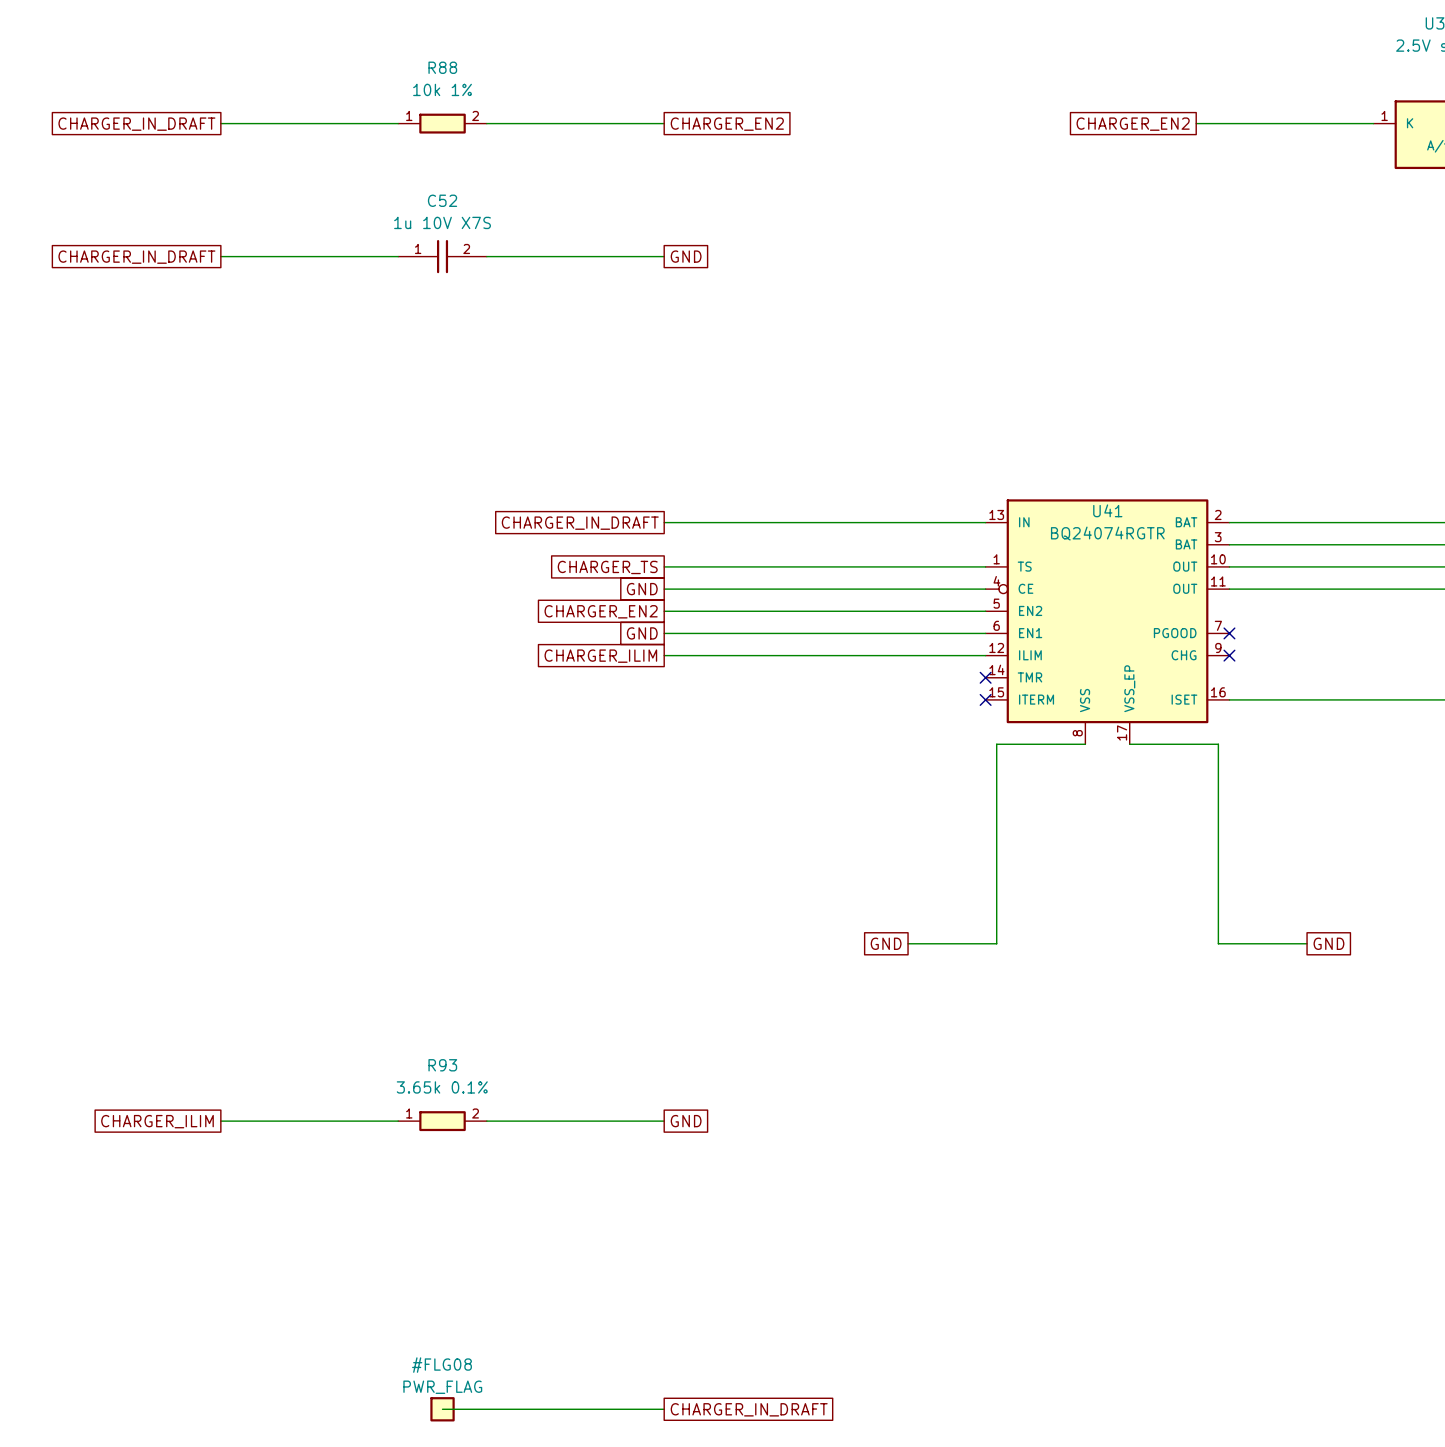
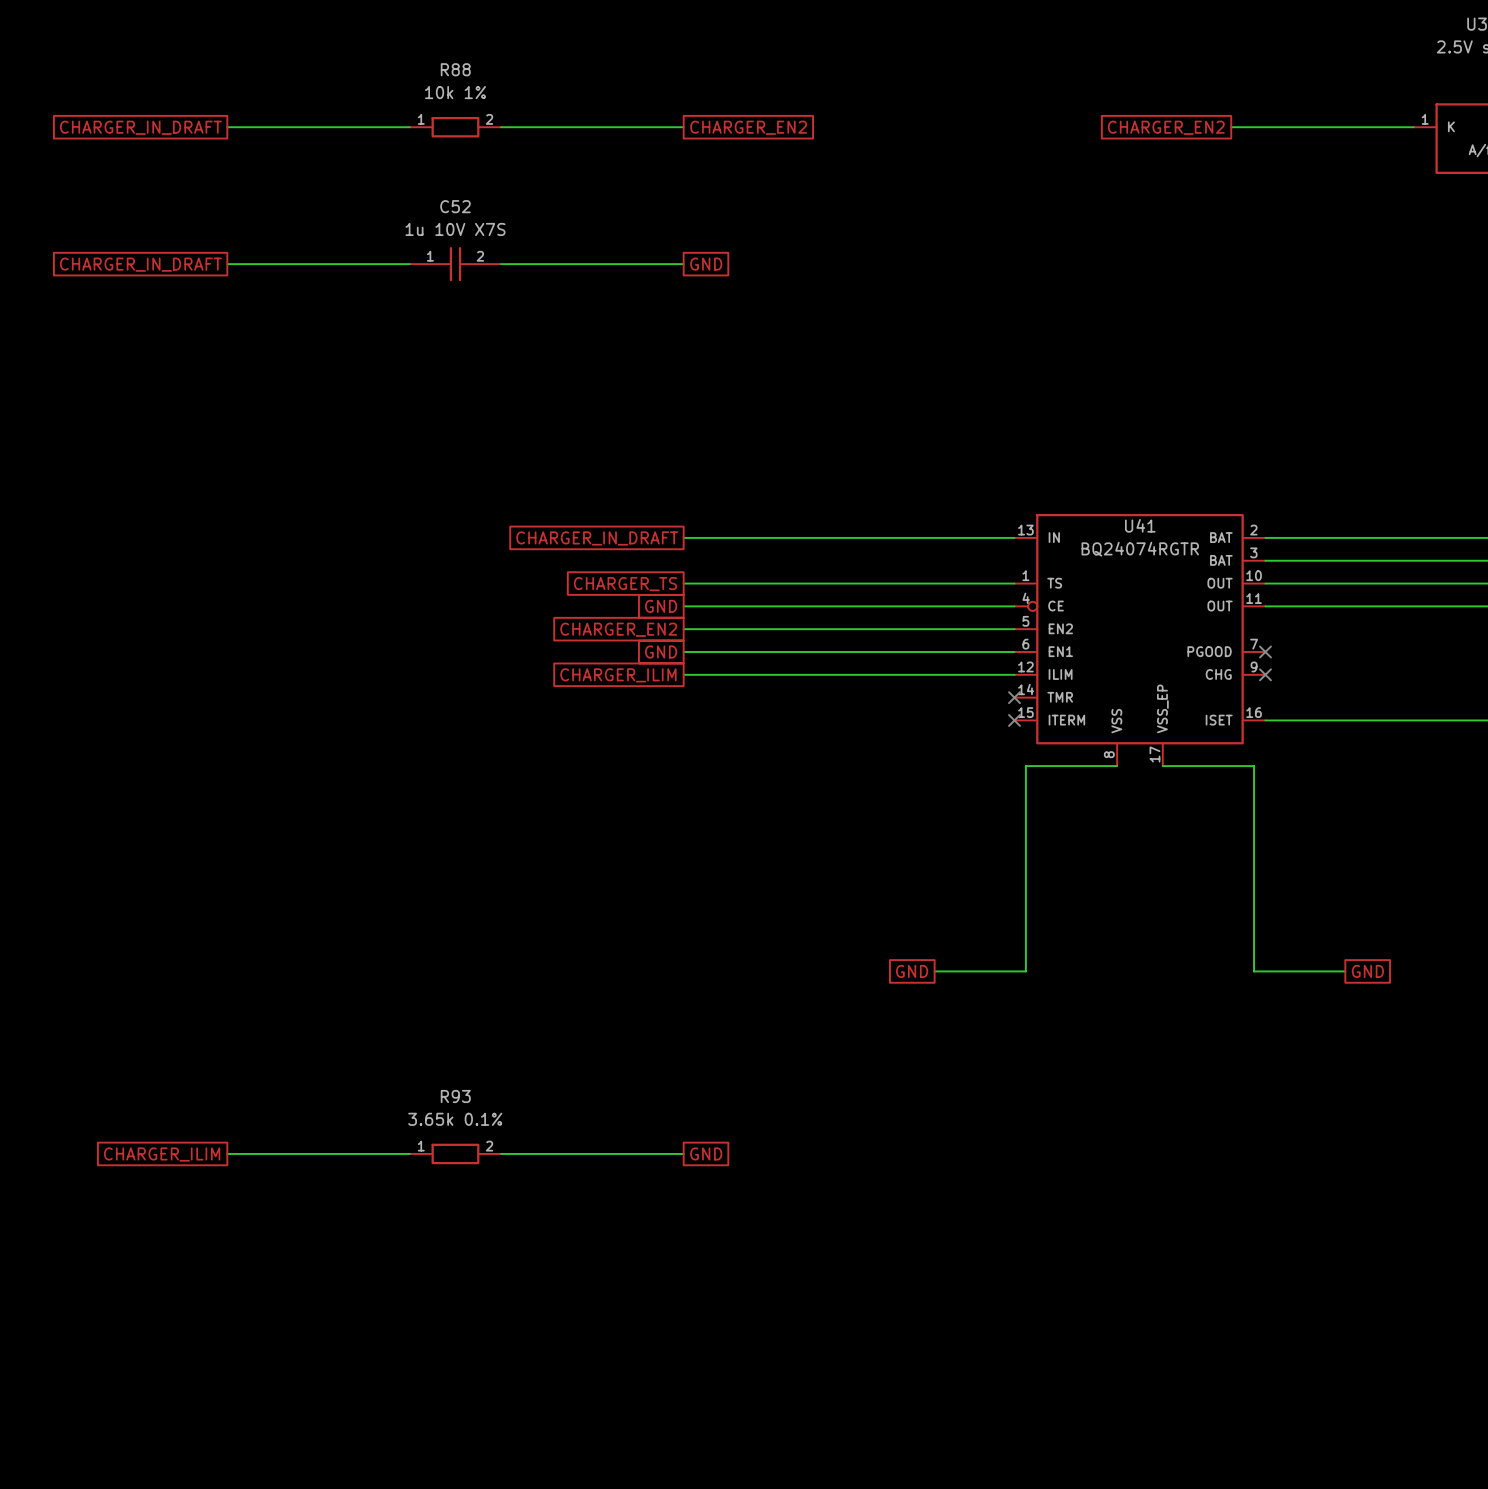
wire: (442, 1409) (664, 1409) -> none
#FLG08: PWR_FLAG (442, 1409) -> none
global label: CHARGER_IN_DRAFT (749, 1409) -> none

